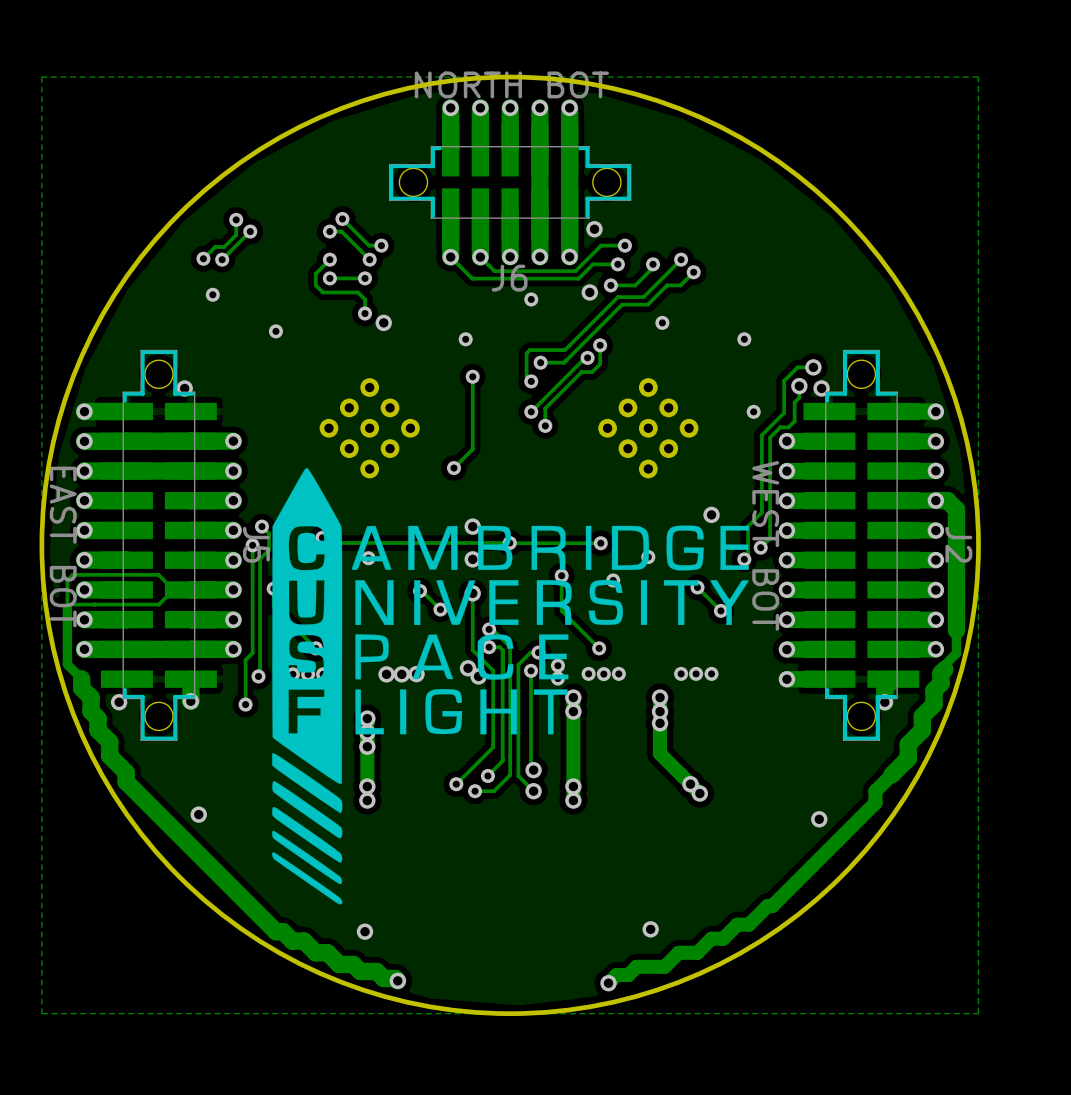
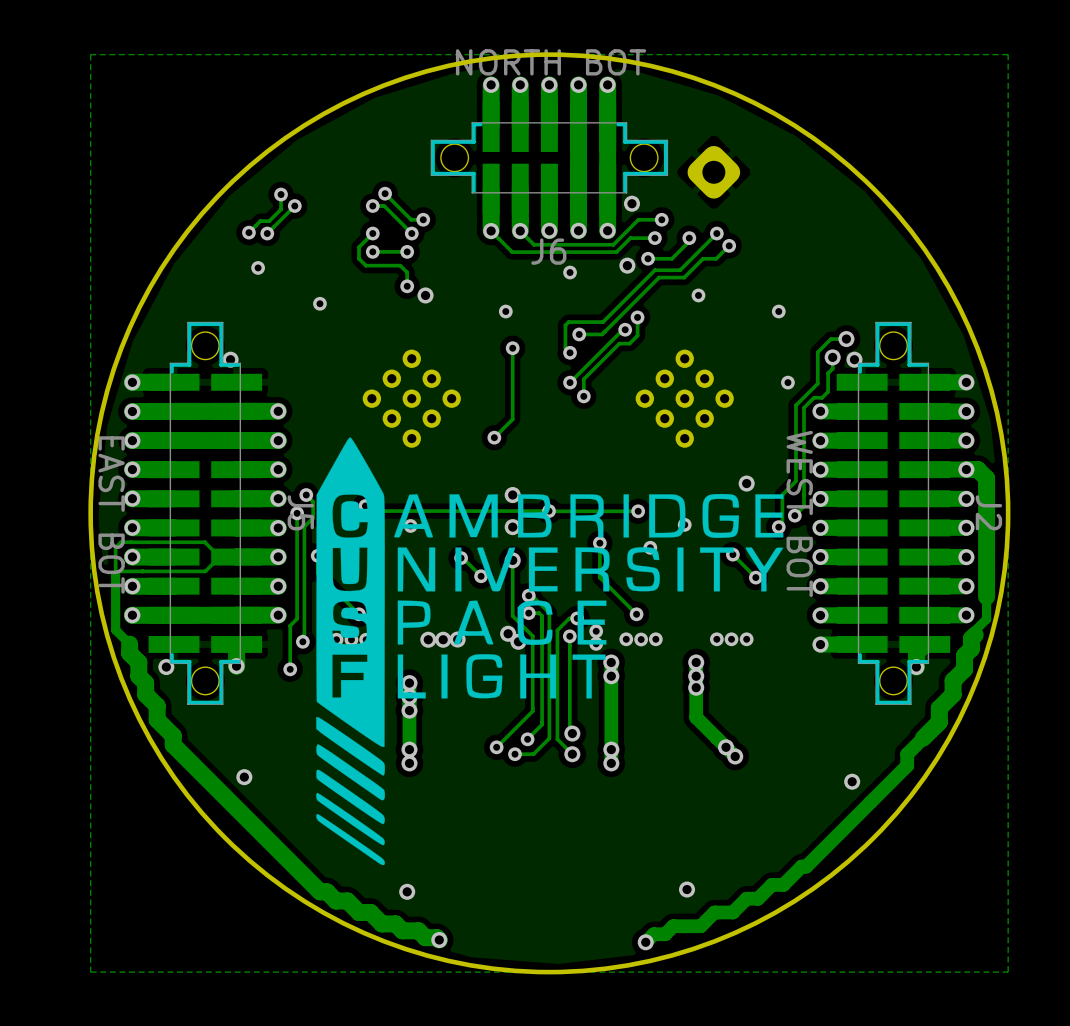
part: none -> (713, 172)

